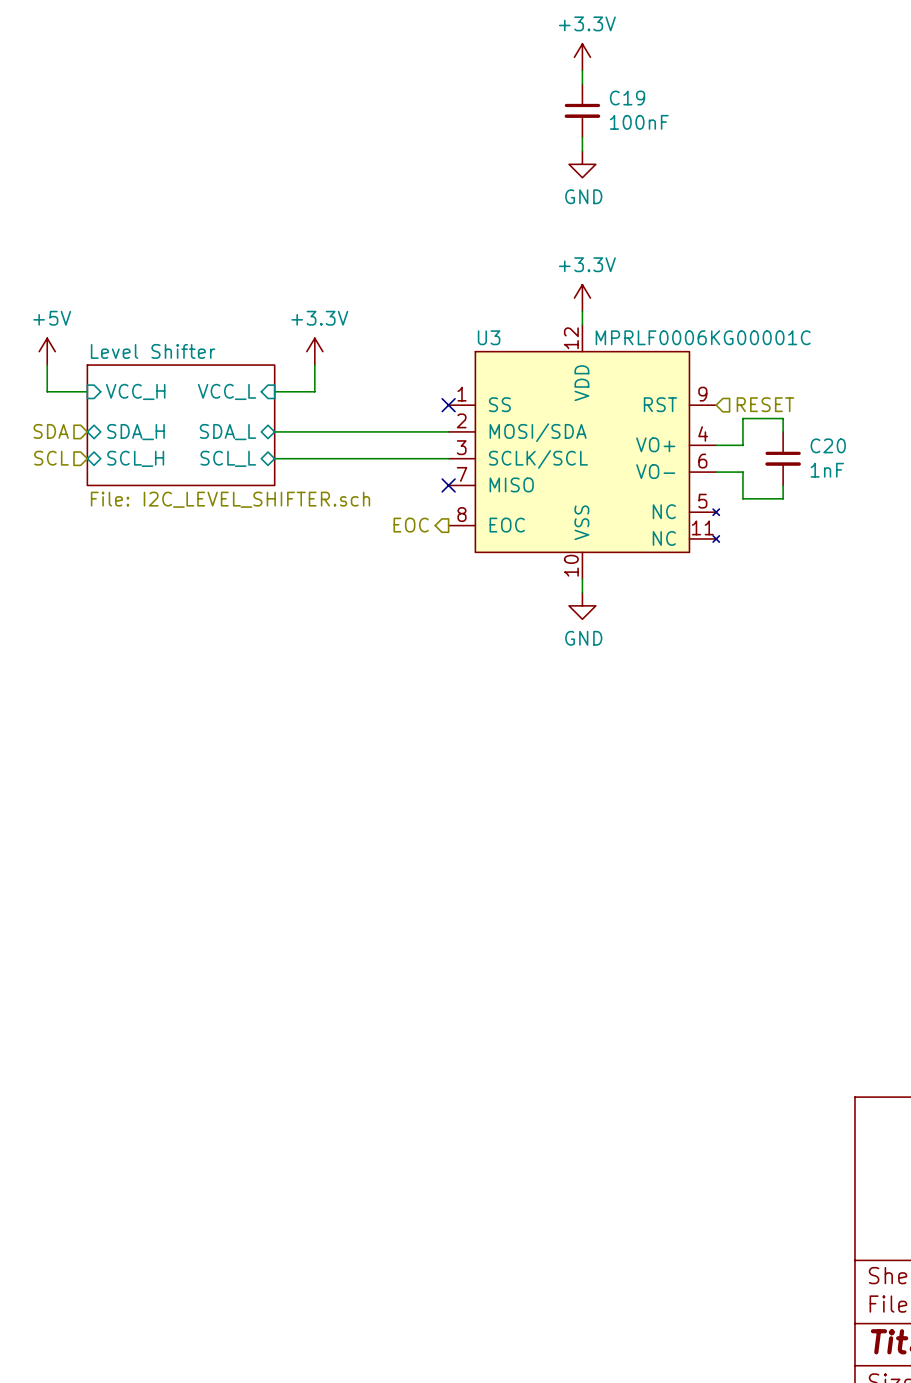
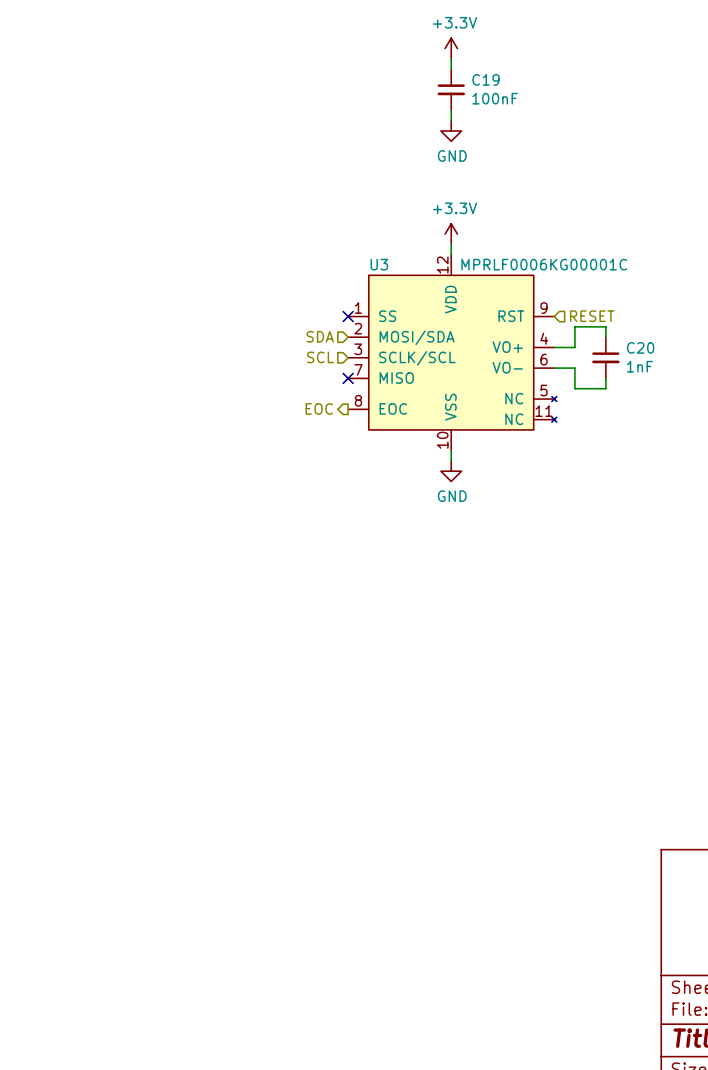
power symbol: +5V (47, 351) -> none
power symbol: +3.3V (314, 351) -> none
wire: (47, 365) (47, 391) (87, 391) -> none
wire: (314, 365) (314, 391) (274, 391) -> none
sheet pin: VCC_H (135, 391) -> none
sheet pin: VCC_L (227, 391) -> none
sheet Level Shifter: File: I2C_LEVEL_SHIFTER.sch (181, 425) -> none
hierarchical label: SDA (51, 431) -> none
wire: (274, 431) (448, 431) -> none
hierarchical label: none -> SDA (320, 336)
sheet pin: SDA_H (136, 432) -> none
sheet pin: SDA_L (227, 432) -> none
hierarchical label: SCL (51, 458) -> none
sheet pin: SCL_H (135, 458) -> none
sheet pin: SCL_L (228, 458) -> none
wire: (274, 458) (448, 458) -> none
hierarchical label: none -> SCL (320, 357)

